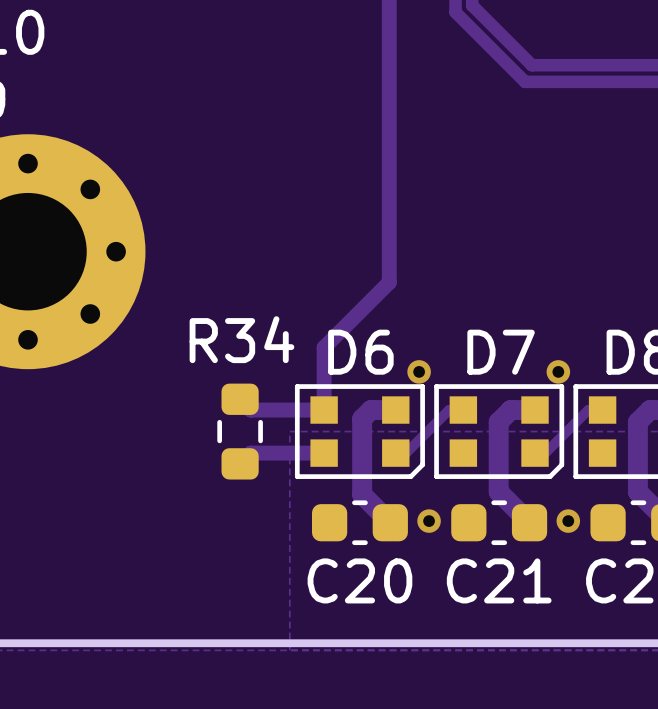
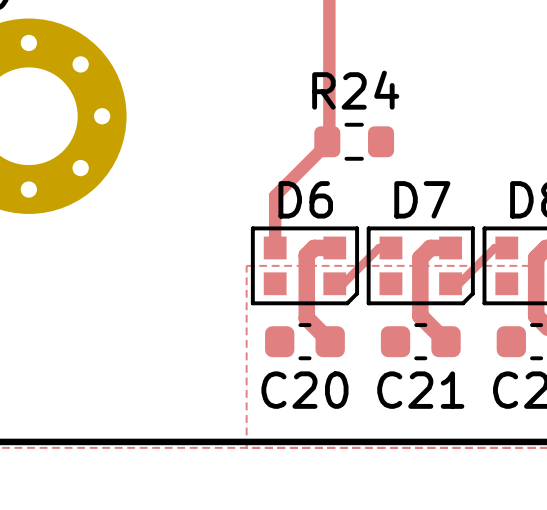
R24: none -> (354, 141)
via: (419, 371) -> none
via: (558, 371) -> none
track: (240, 399) (250, 410) (324, 410) -> none
R34: (240, 431) -> none
track: (324, 453) (250, 453) (240, 463) -> none
via: (429, 521) -> none
via: (568, 521) -> none

